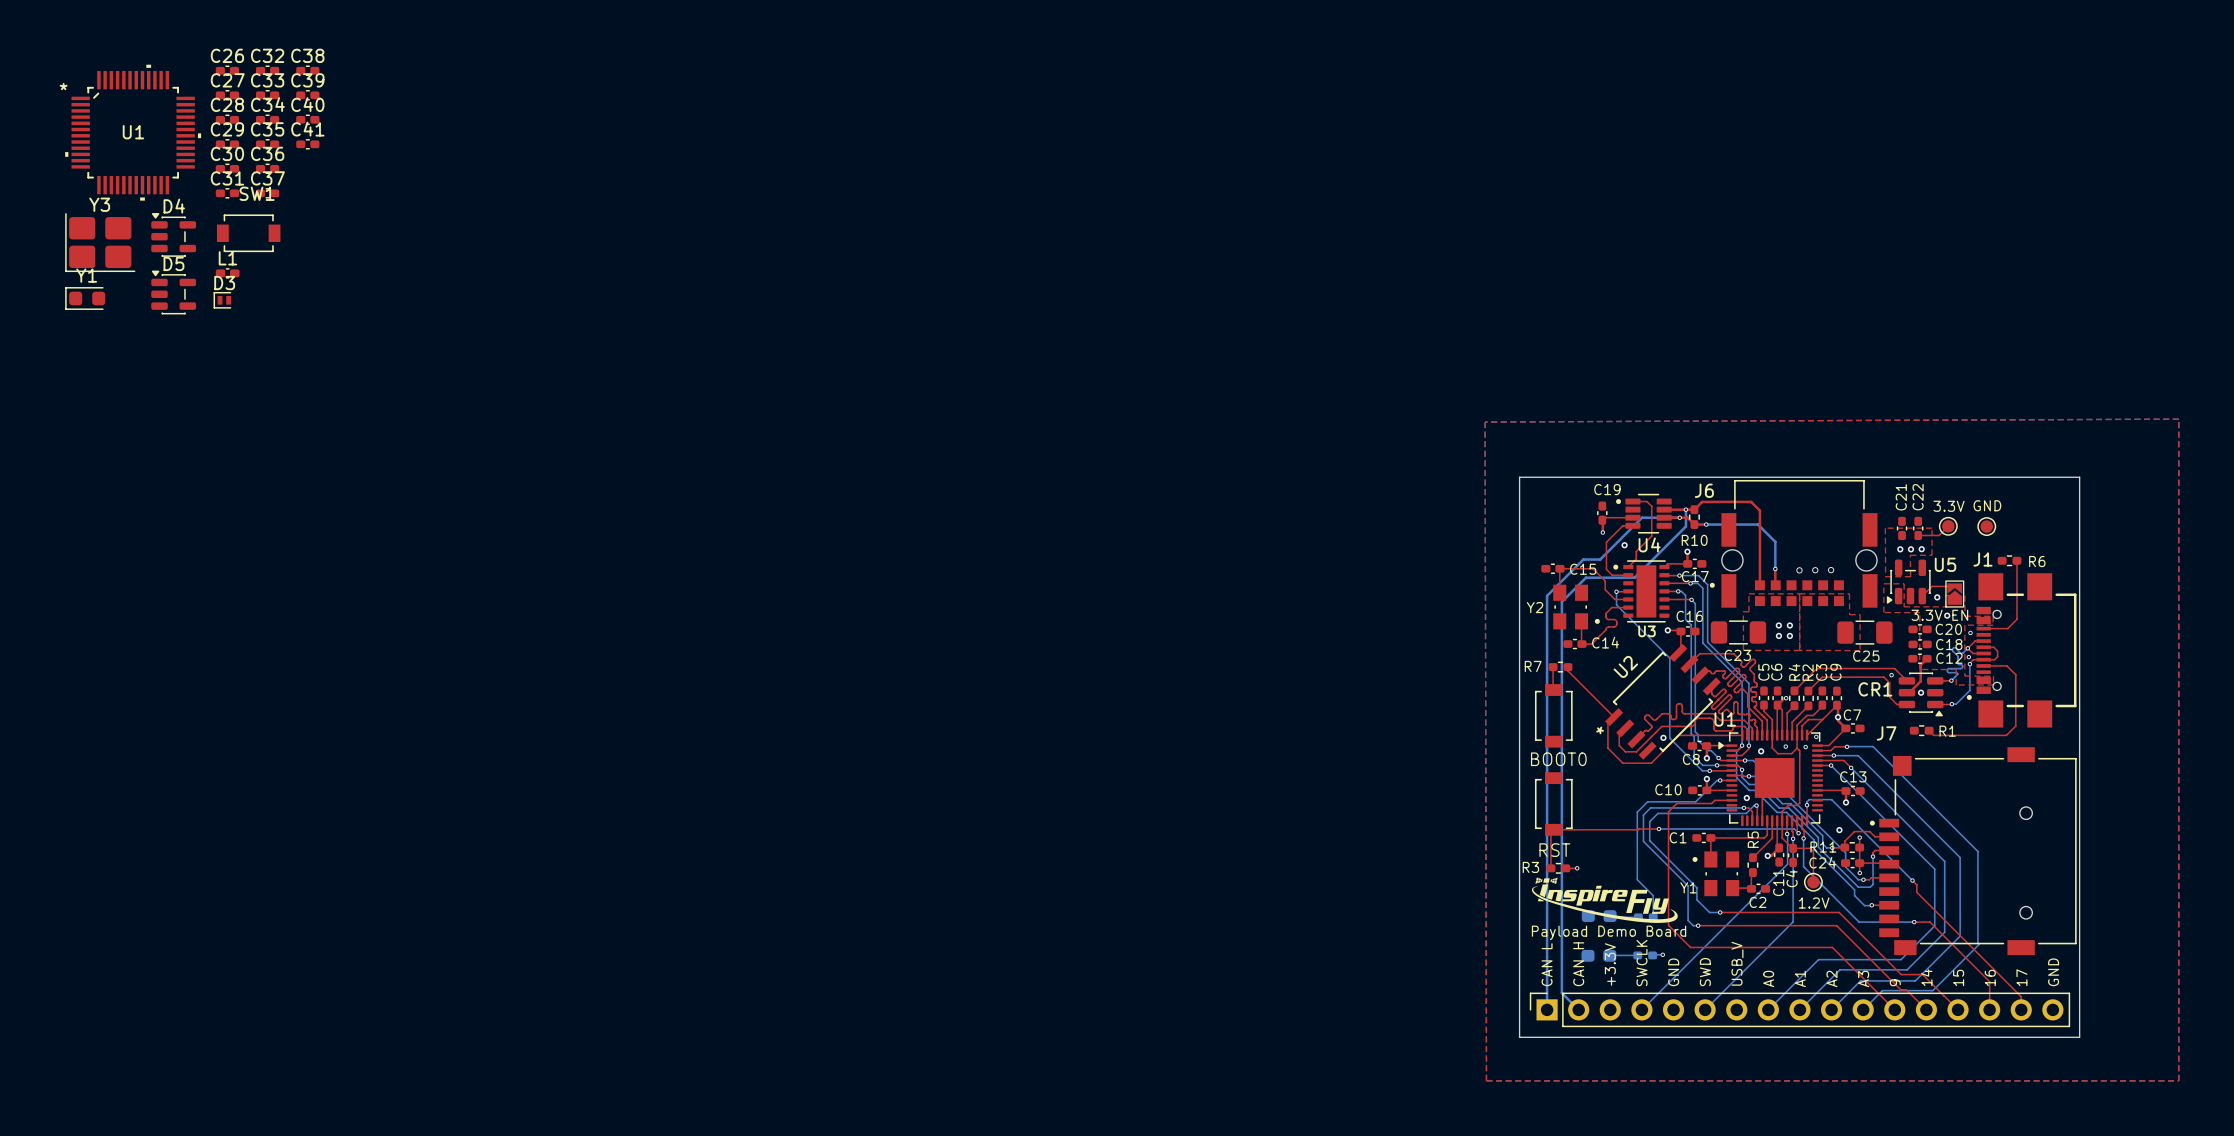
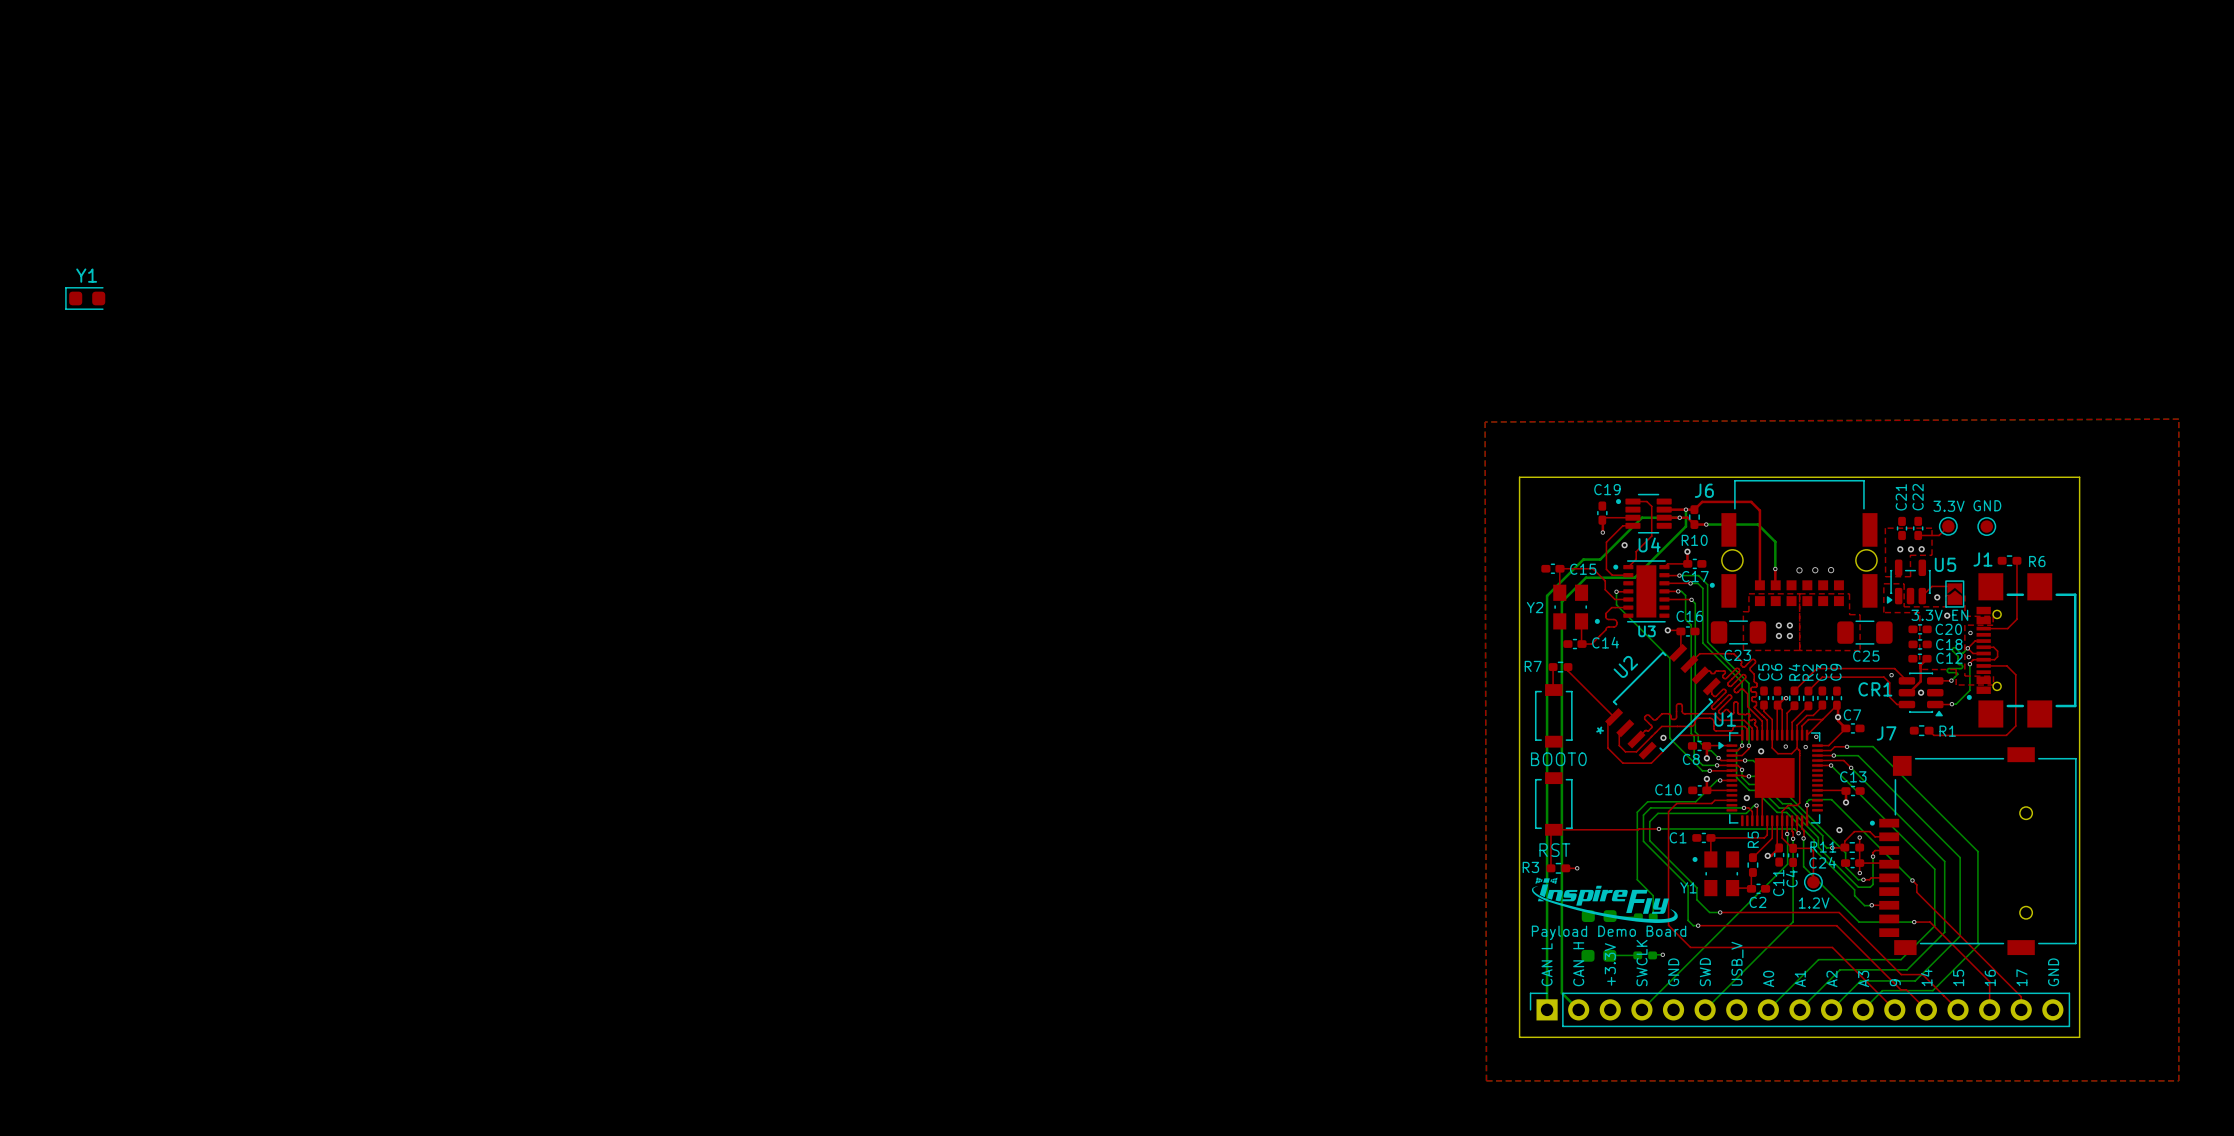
C26: (227, 70) -> none
C32: (267, 70) -> none
C38: (307, 70) -> none
C27: (227, 95) -> none
C33: (267, 95) -> none
C39: (307, 95) -> none
C28: (227, 119) -> none
C34: (267, 119) -> none
C40: (307, 119) -> none
U1: (133, 132) -> none
C29: (227, 144) -> none
C35: (267, 144) -> none
C41: (307, 144) -> none
C30: (227, 168) -> none
C36: (267, 168) -> none
C31: (227, 193) -> none
C37: (267, 193) -> none
SW1: (248, 233) -> none
D4: (173, 234) -> none
Y3: (100, 242) -> none
L1: (227, 273) -> none
D5: (173, 292) -> none
D3: (222, 300) -> none

